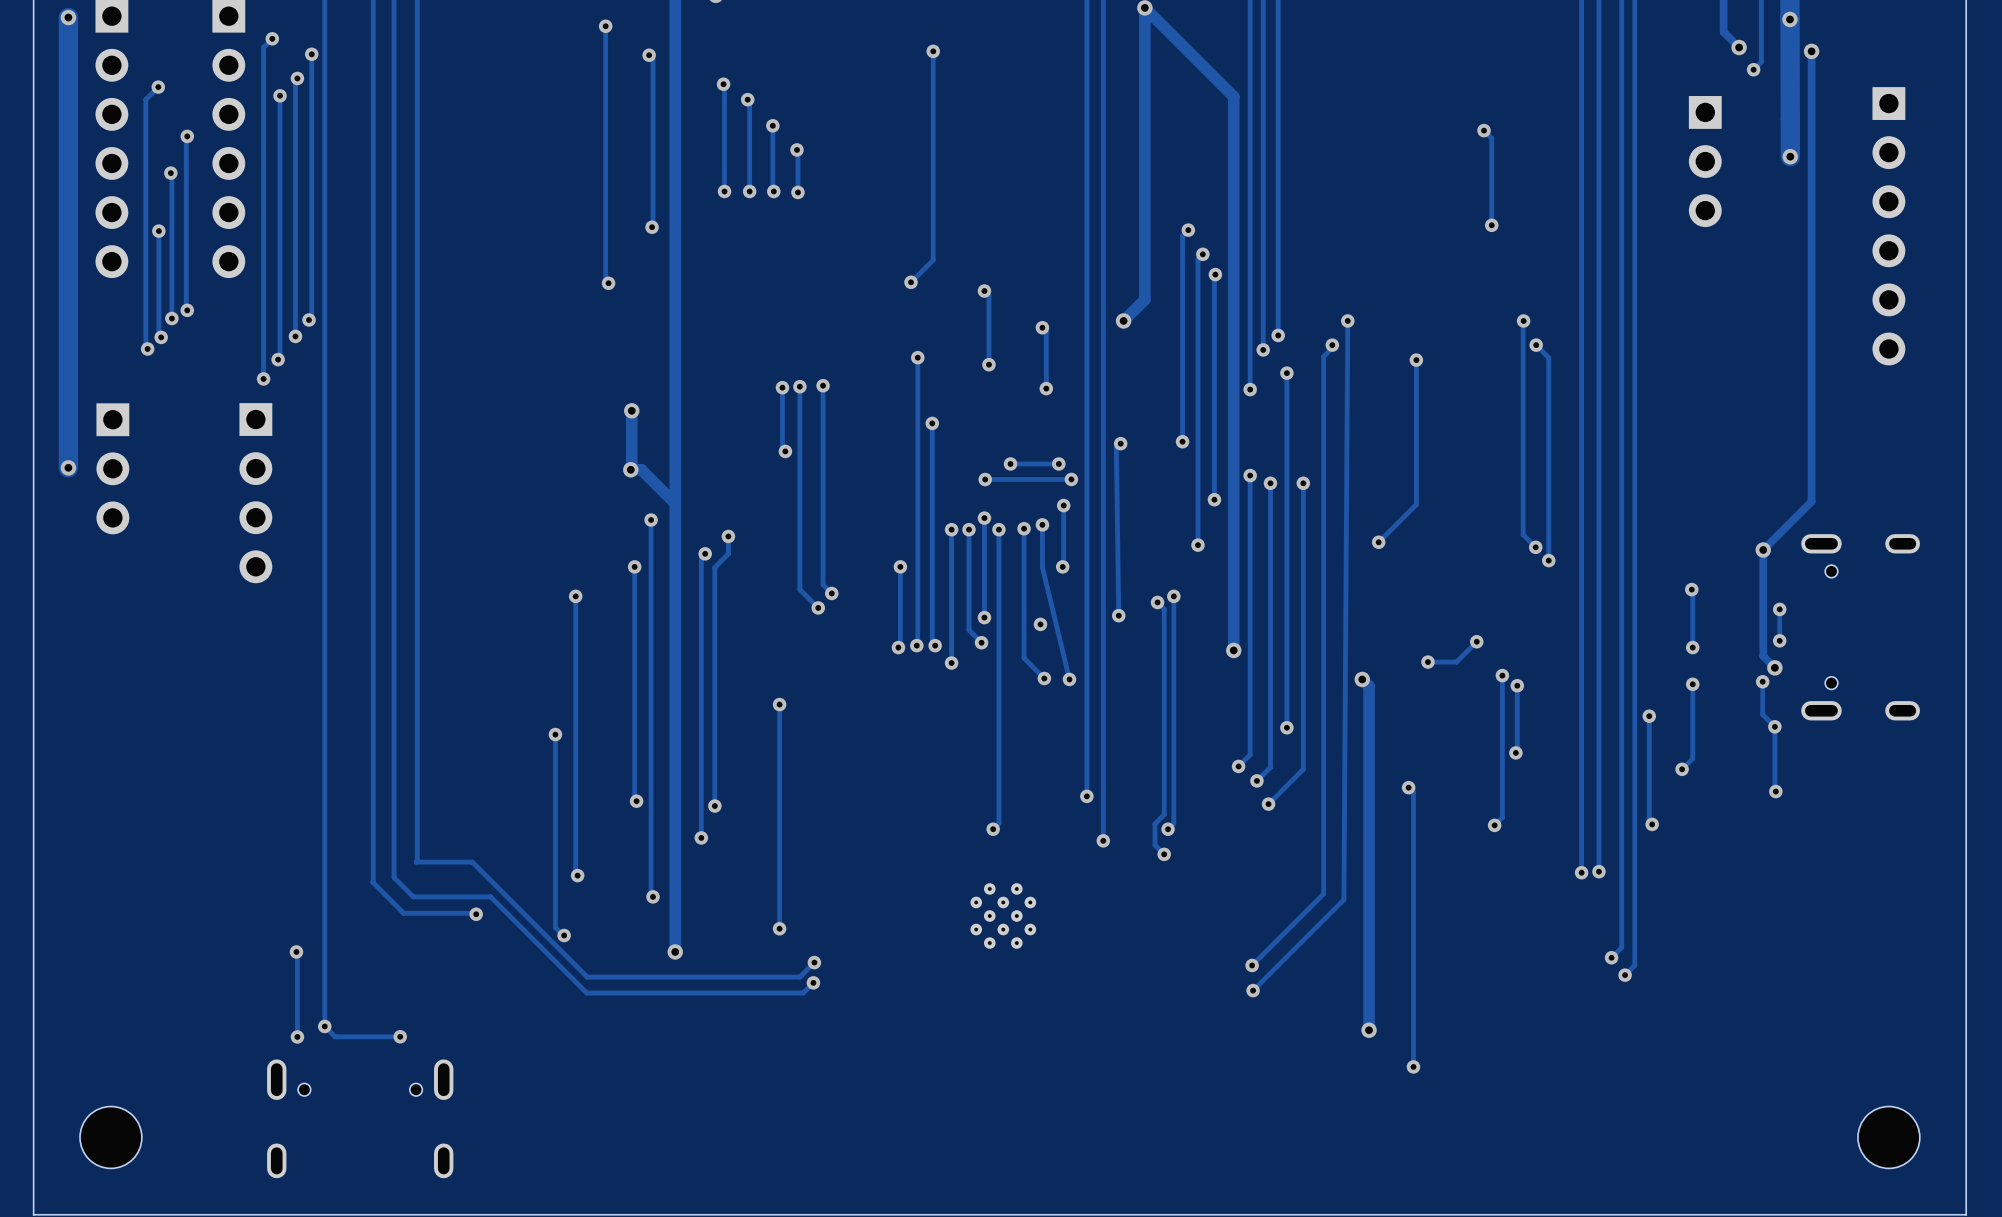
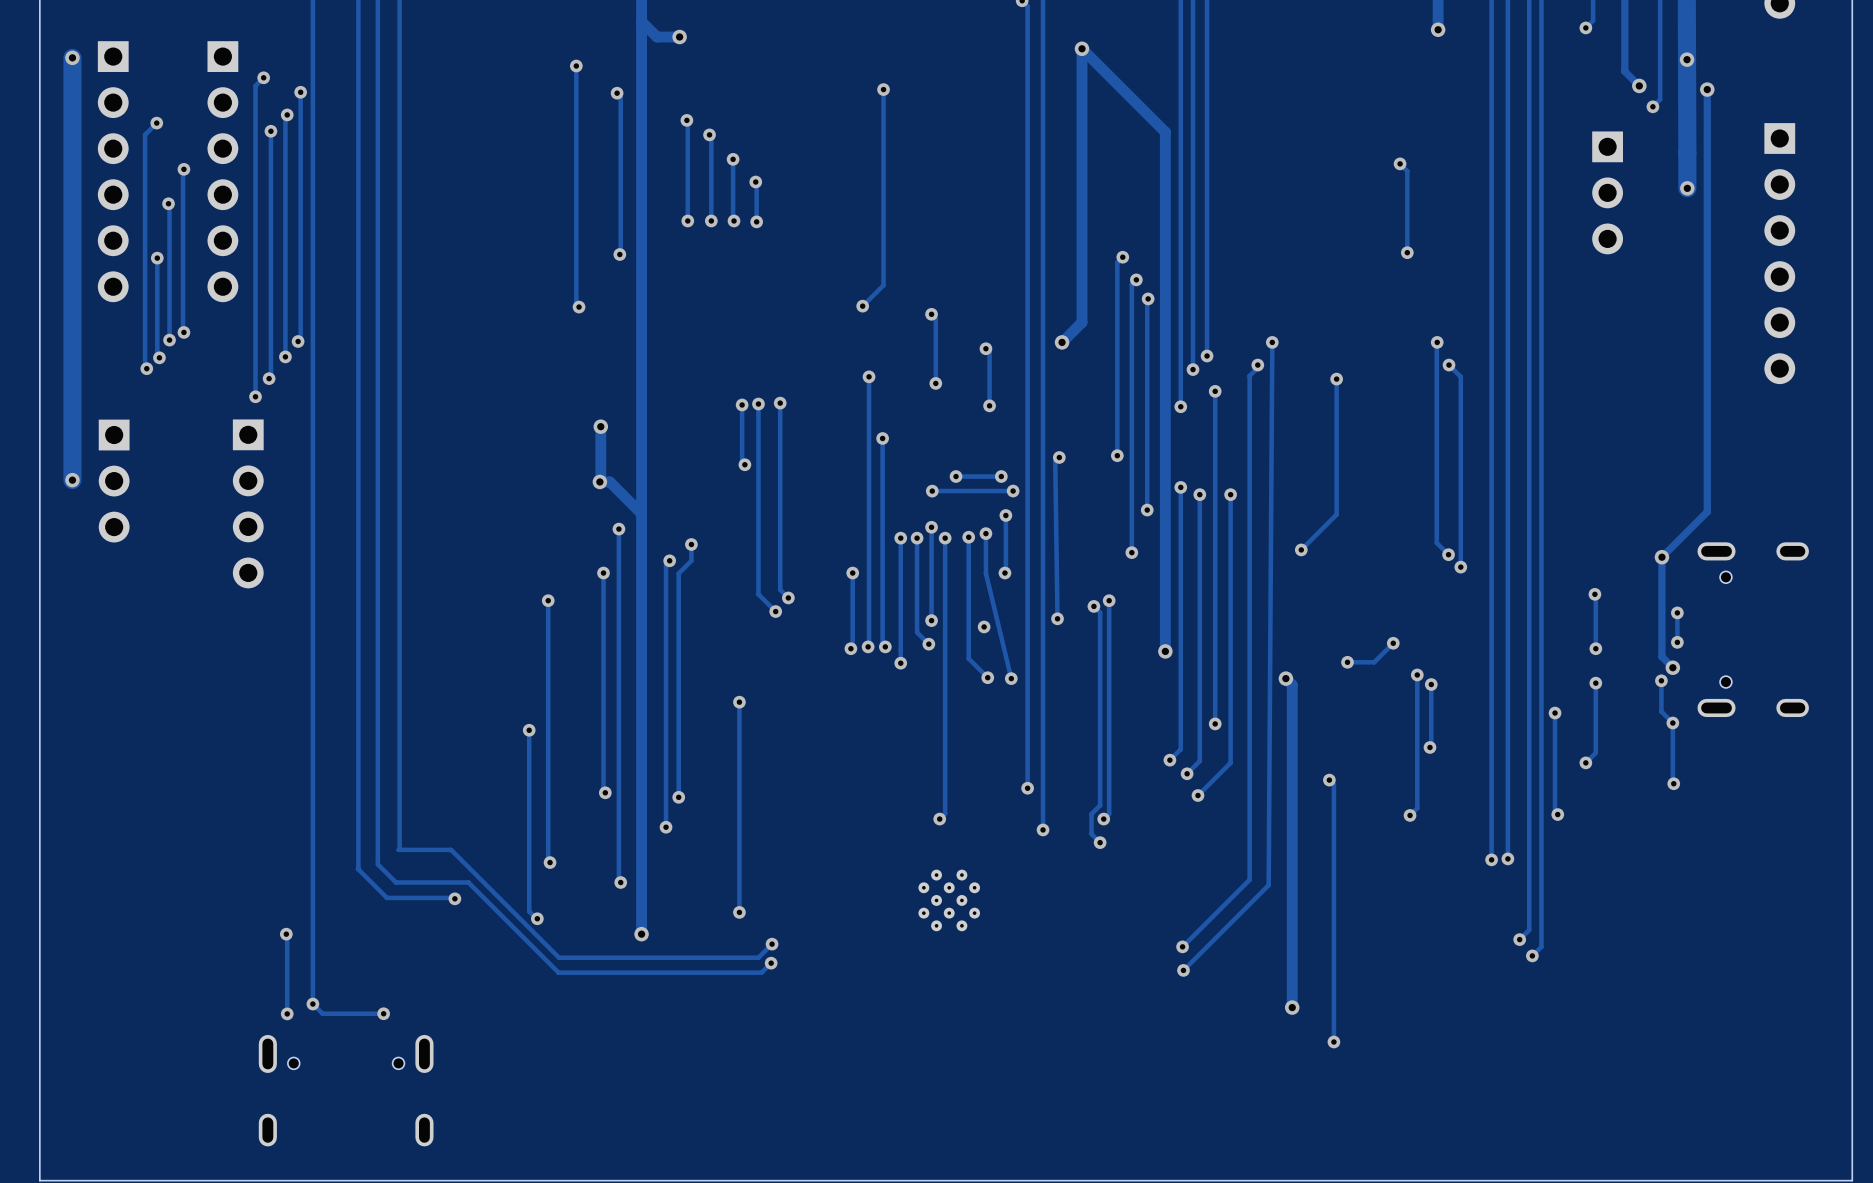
part: (110, 1137) -> none
part: (1888, 1137) -> none

